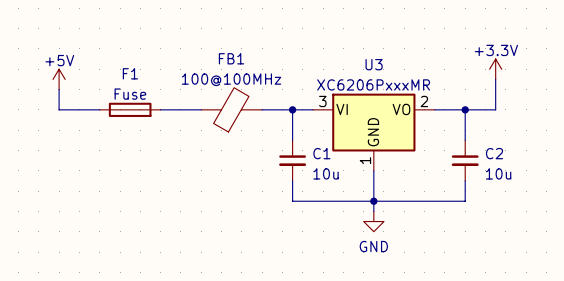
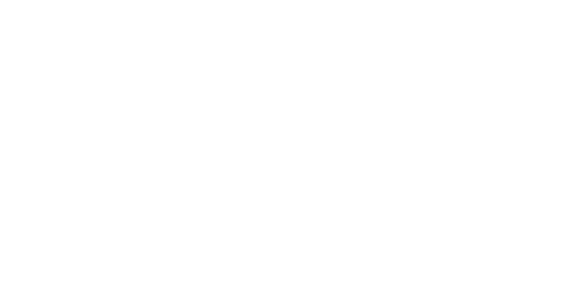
power symbol: +3.3V (495, 69) -> none
power symbol: +5V (59, 79) -> none
wire: (495, 79) (495, 109) (434, 109) -> none
wire: (59, 89) (59, 109) (99, 109) -> none
F1: Fuse (130, 109) -> none
wire: (160, 109) (201, 109) -> none
FB1: 100@100MHz (231, 109) -> none
wire: (262, 109) (312, 109) -> none
wire: (292, 109) (292, 140) -> none
junction: (292, 109) -> none
wire: (465, 109) (465, 140) -> none
junction: (465, 109) -> none
U3: XC6206PxxxMR (373, 132) -> none
C1: 10u (292, 160) -> none
C2: 10u (465, 160) -> none
wire: (373, 170) (373, 211) -> none
wire: (292, 180) (292, 201) (465, 201) (465, 180) -> none
junction: (373, 201) -> none
power symbol: GND (373, 221) -> none

